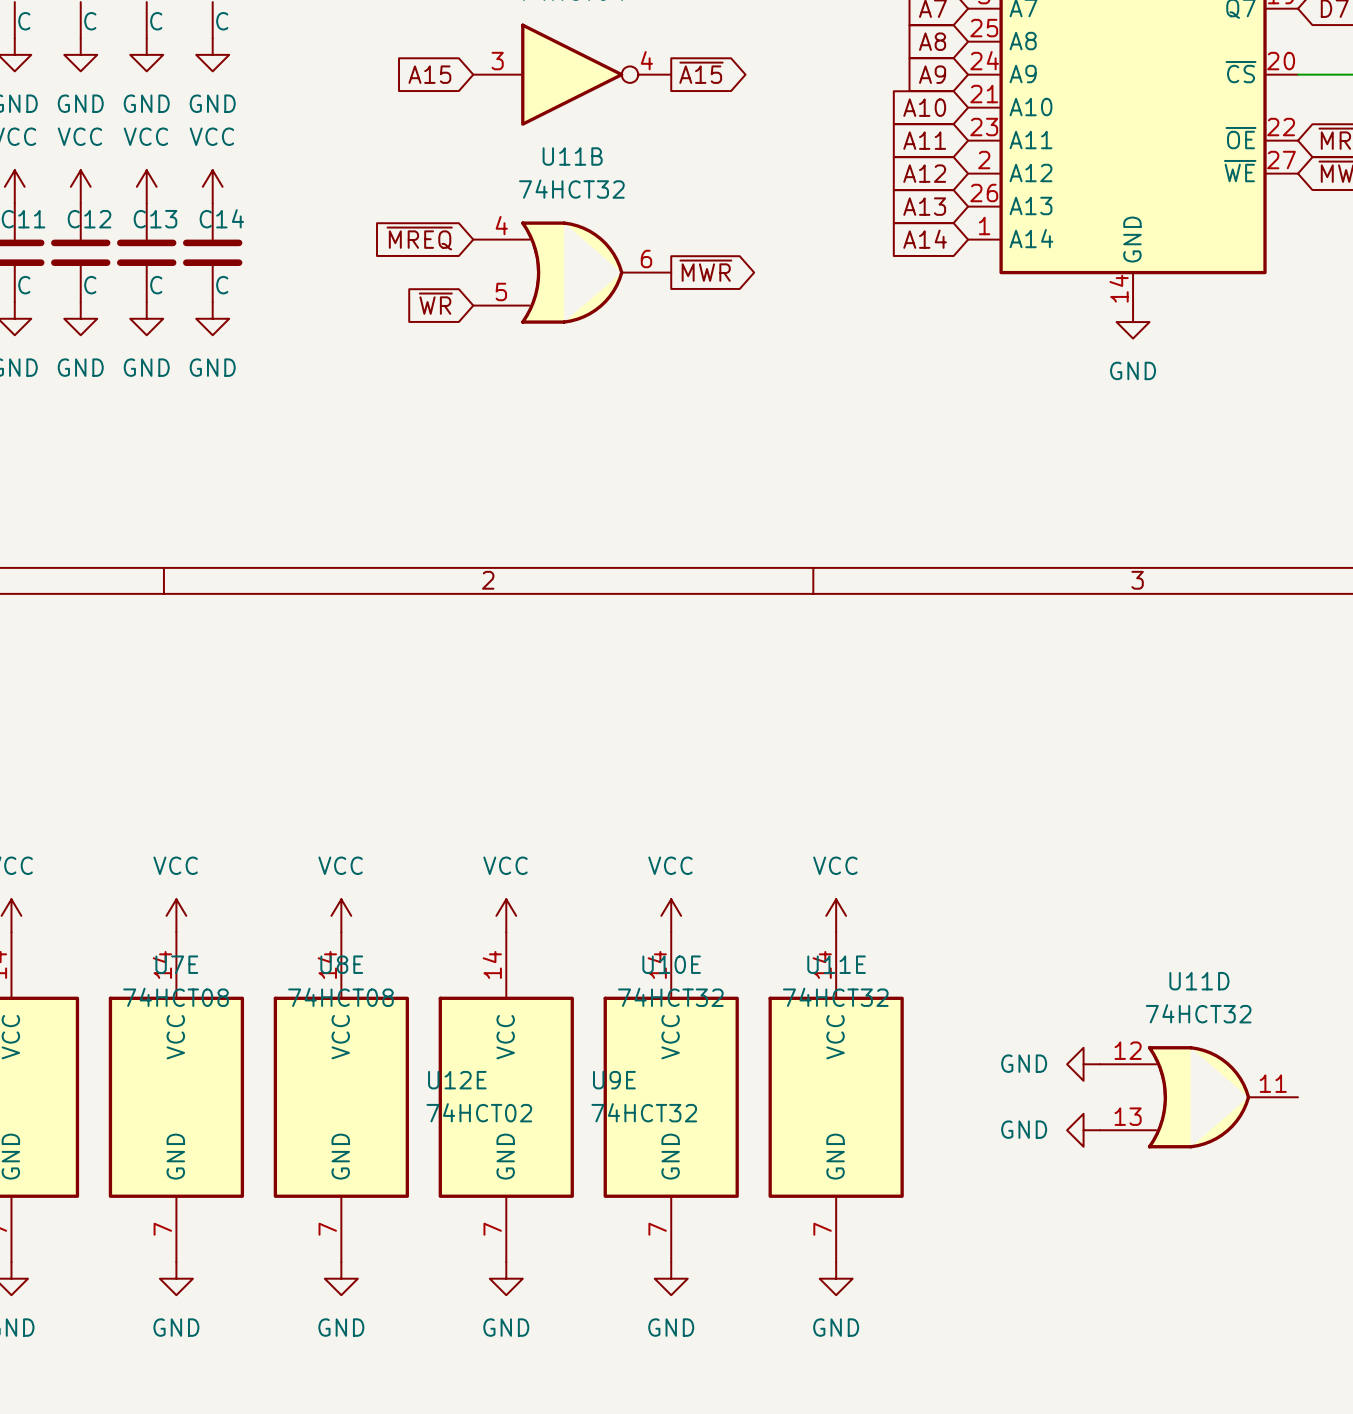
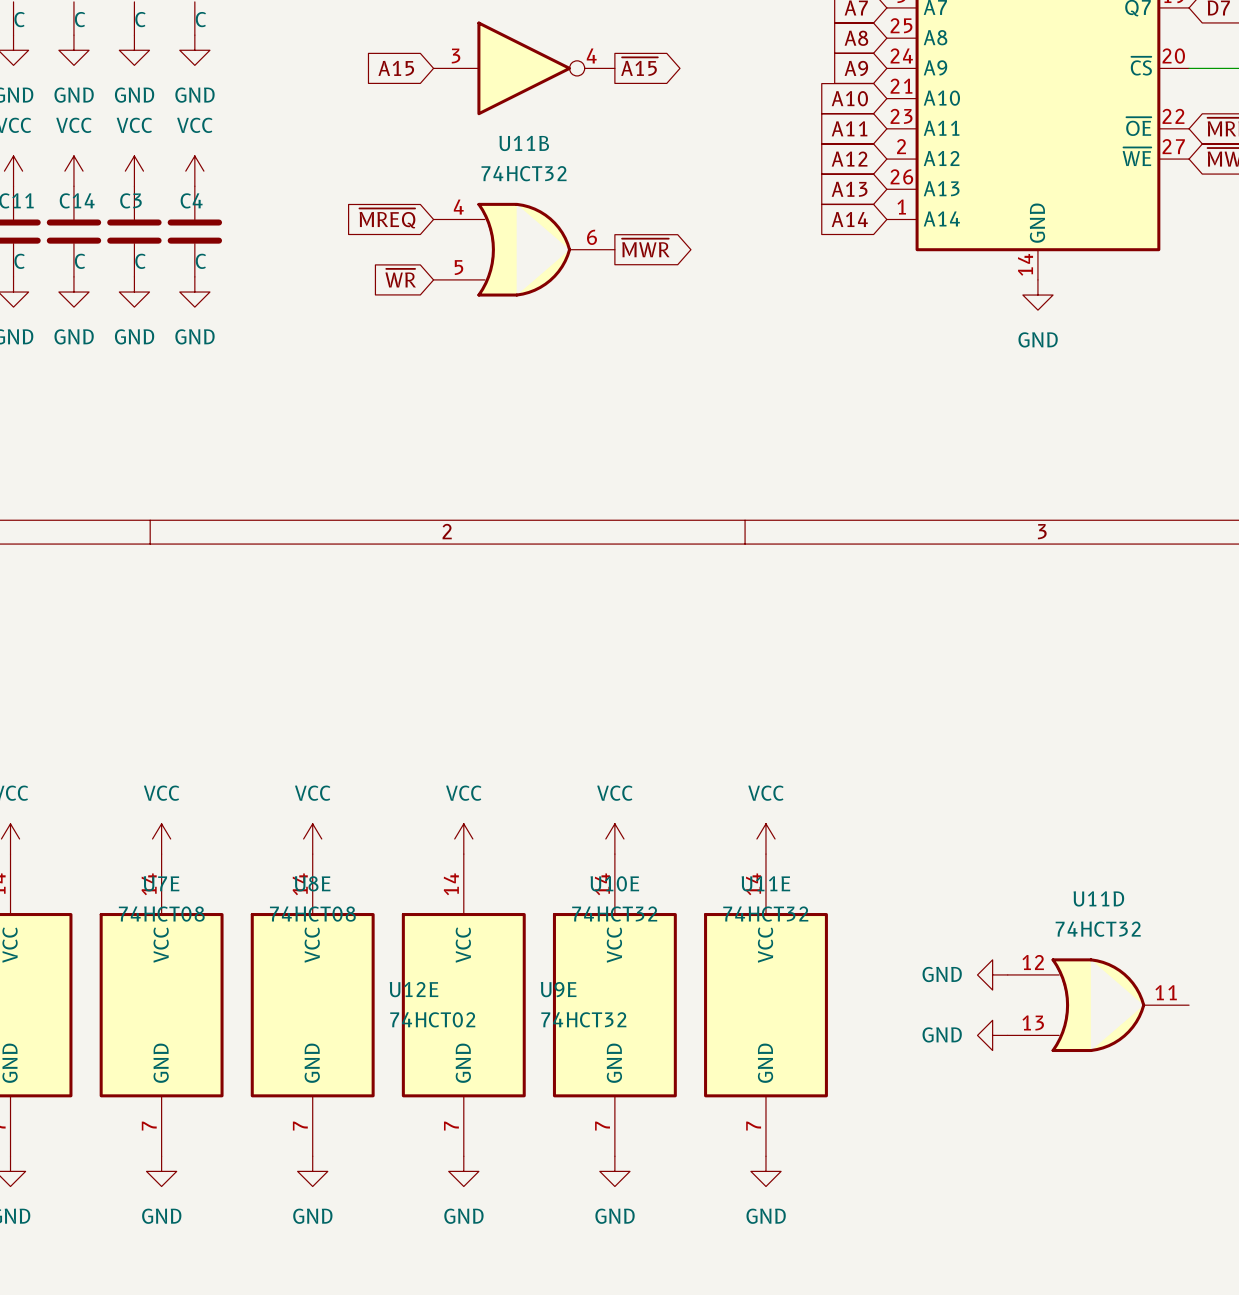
C14 name: C14 (221, 218) -> C4 (191, 200)
C12 name: C12 (89, 219) -> C14 (77, 200)
C13 name: C13 (155, 219) -> C3 (130, 200)

